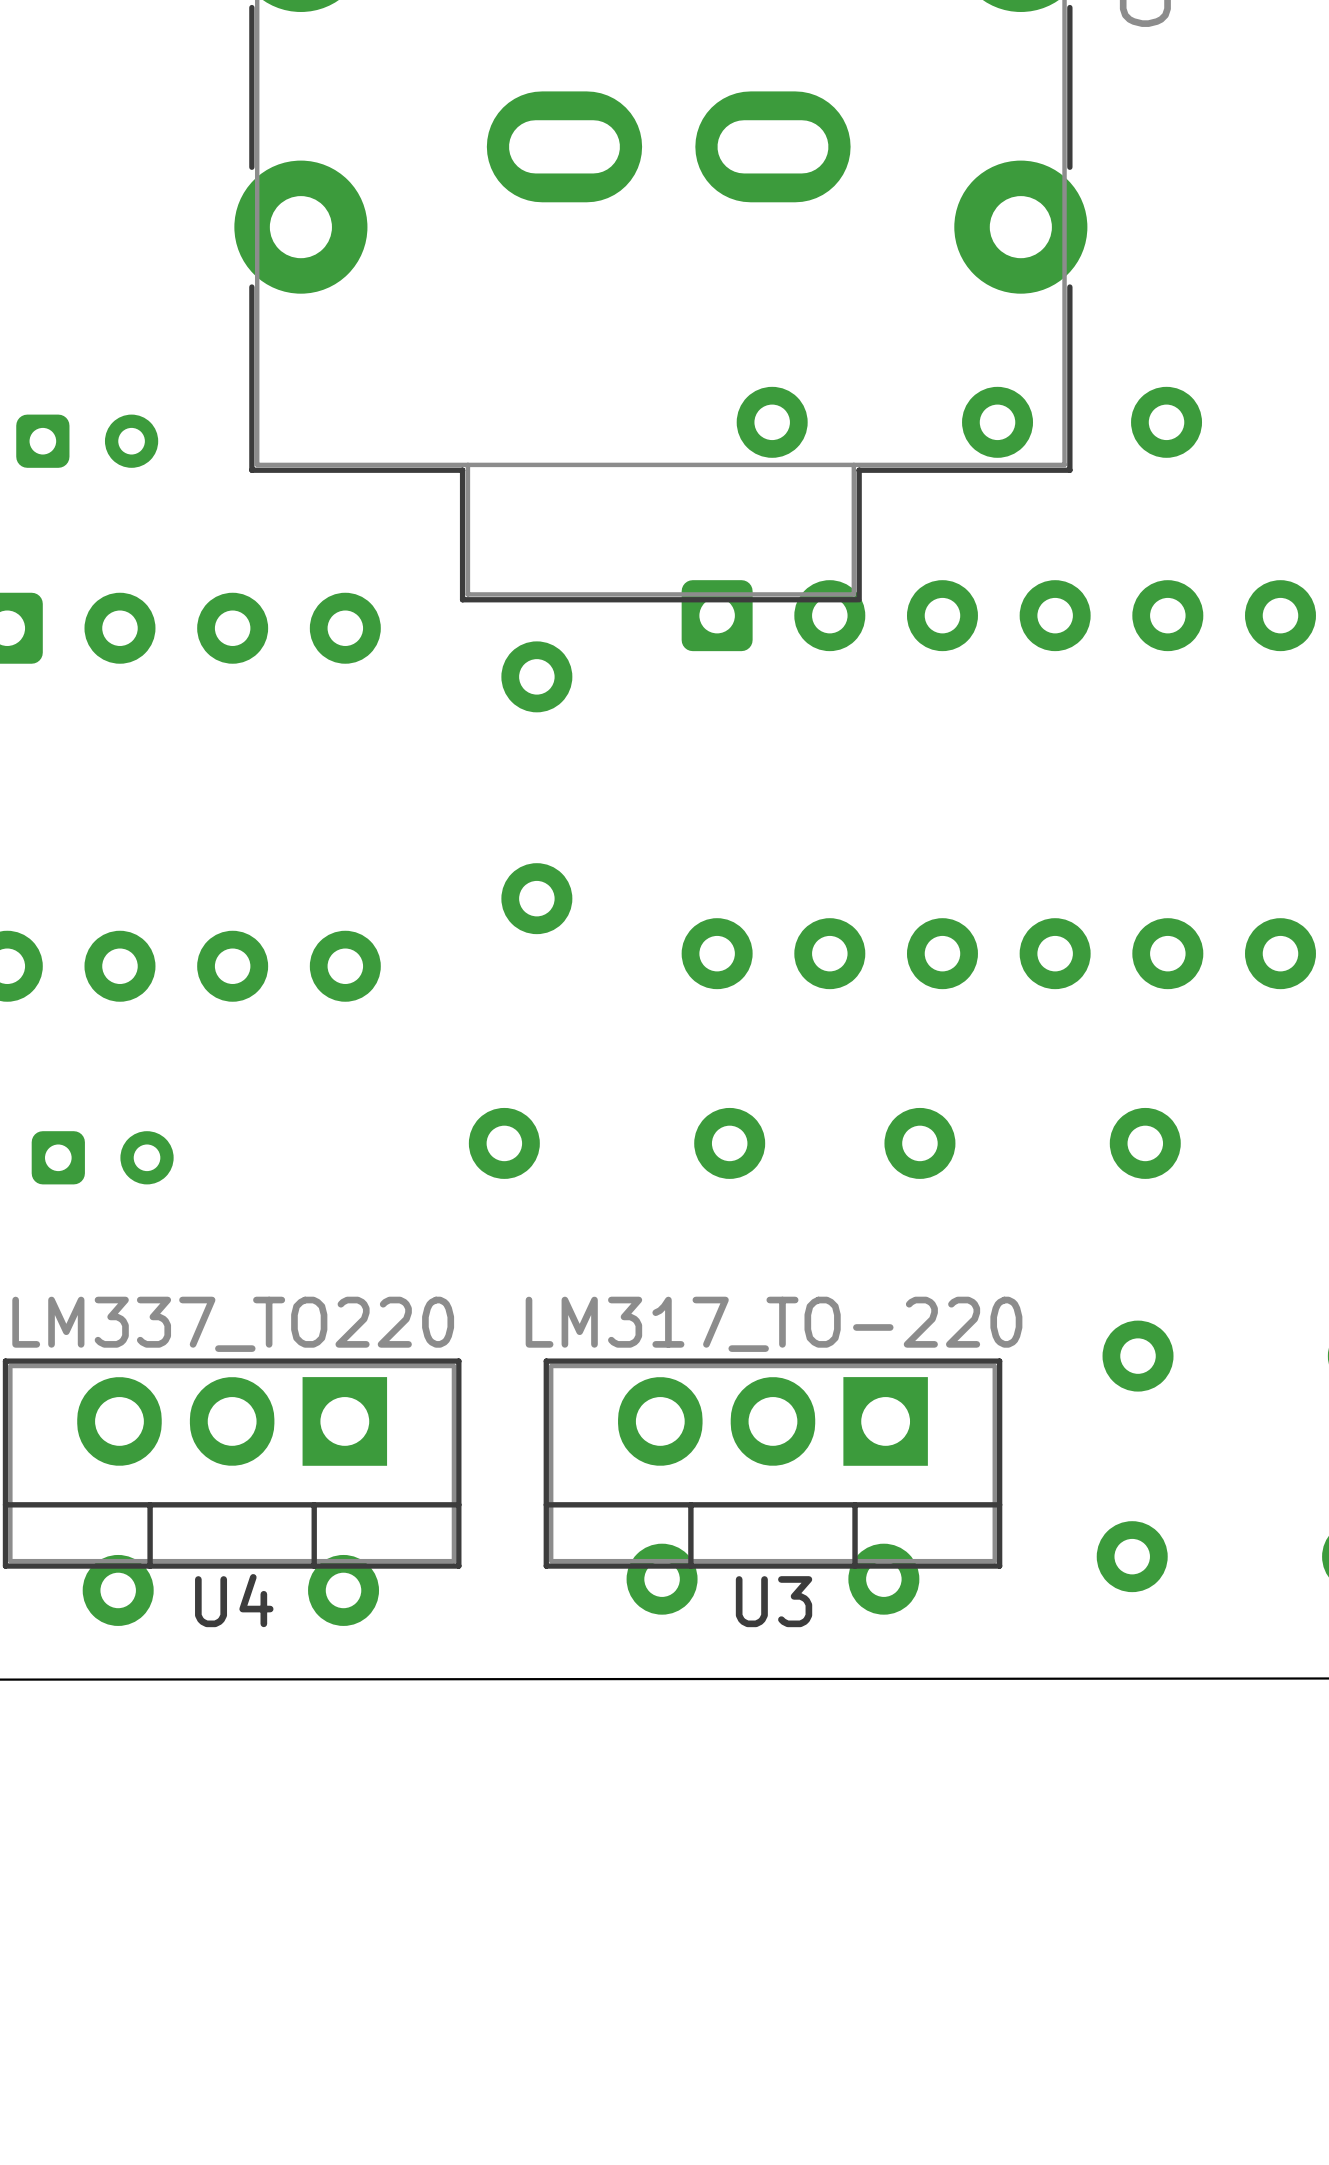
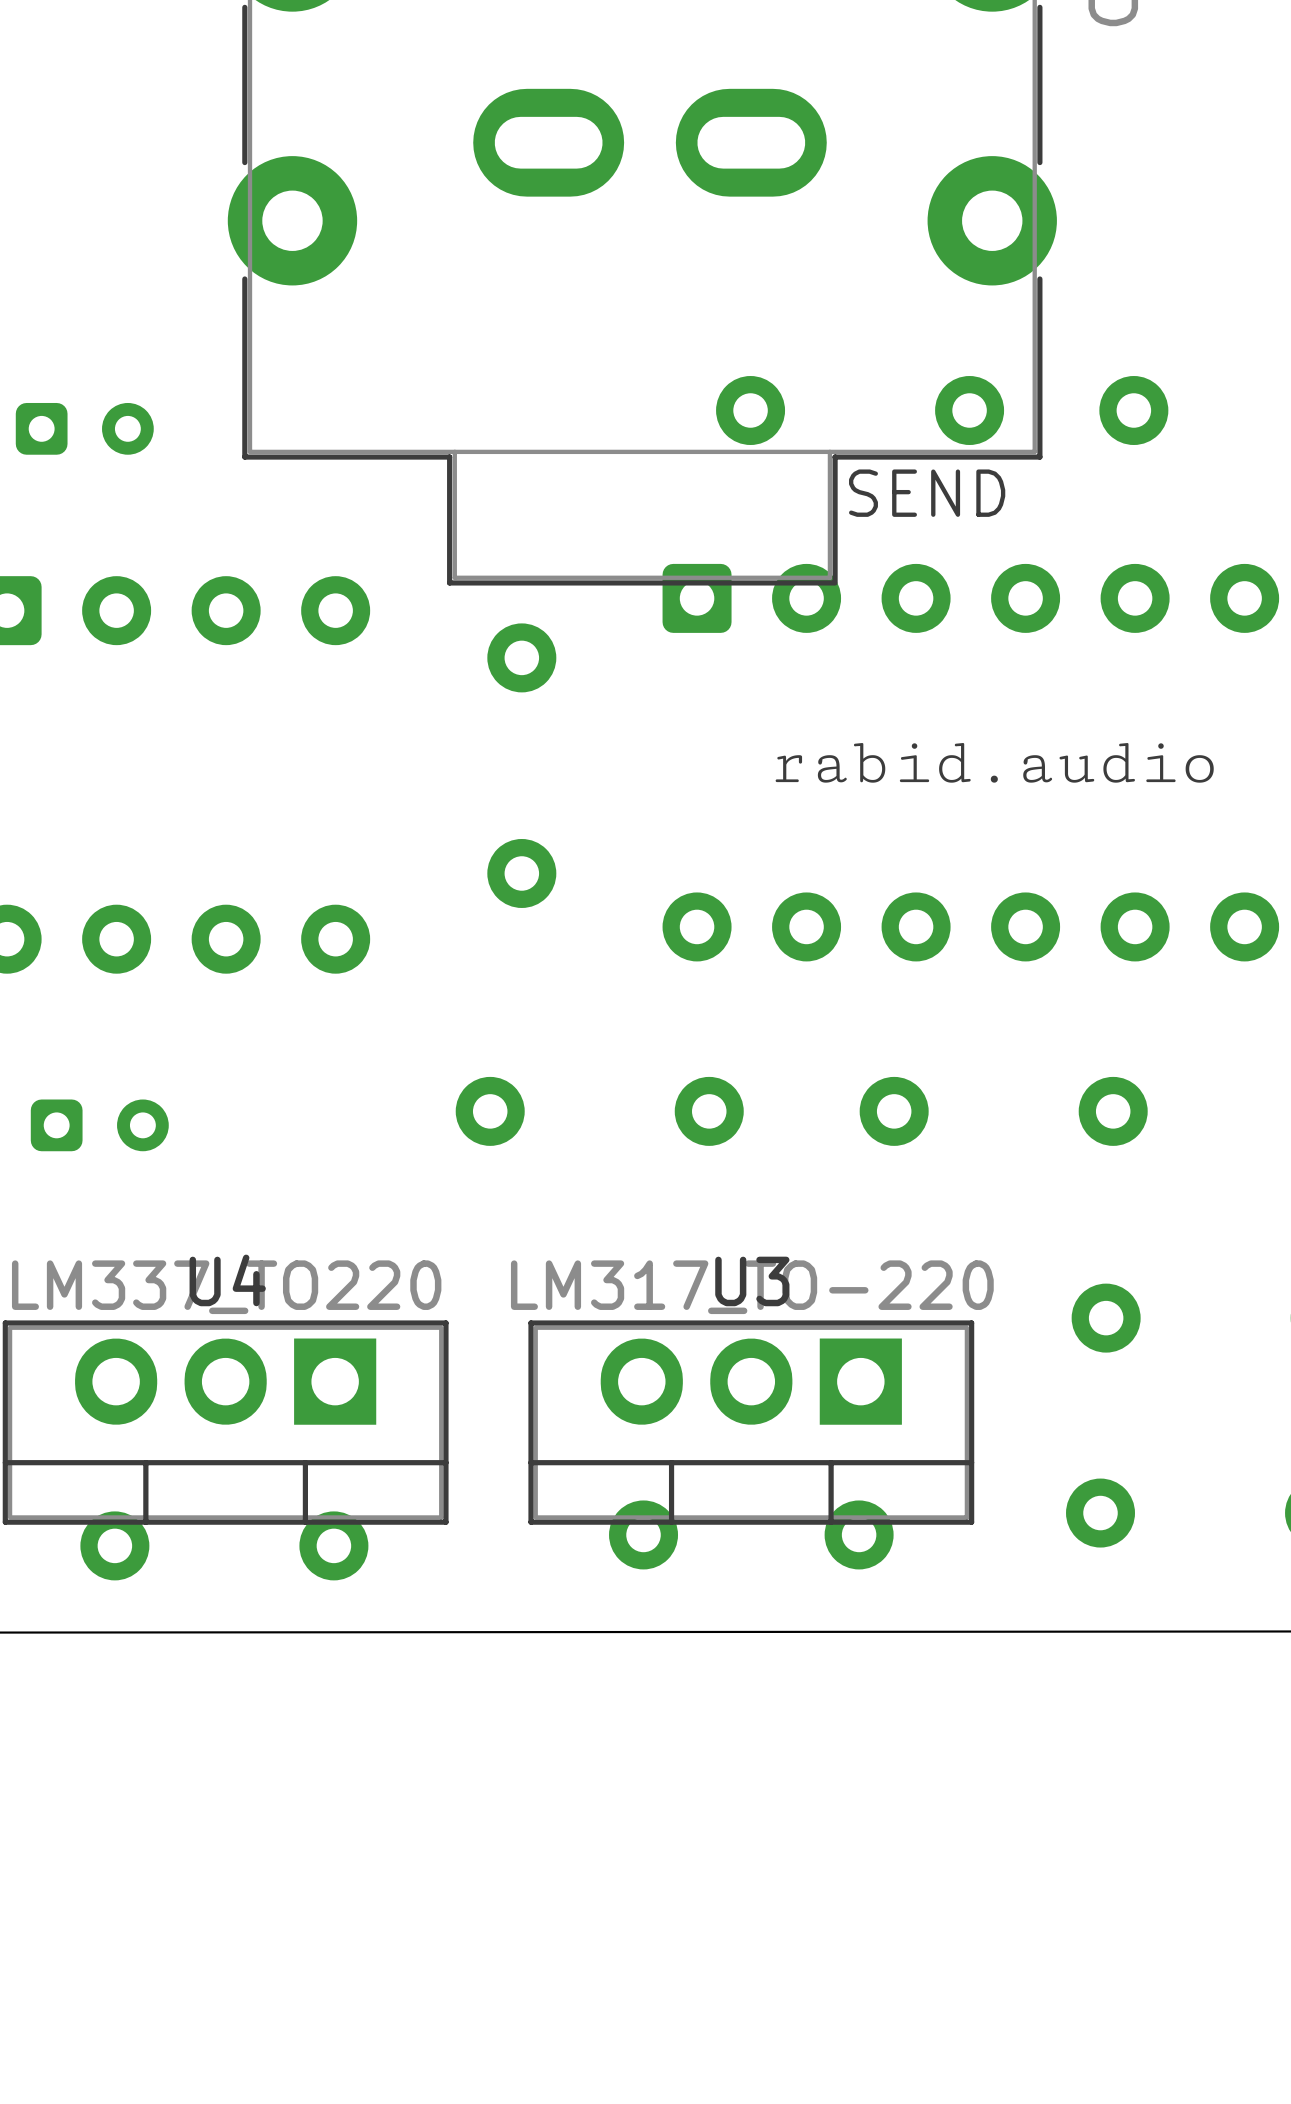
text: none -> SEND (927, 493)
drawing: none -> [775, 743, 1214, 783]
U4 name position: U4 (234, 1600) -> U4 (227, 1280)
U3 name position: U3 (774, 1601) -> U3 (752, 1281)

